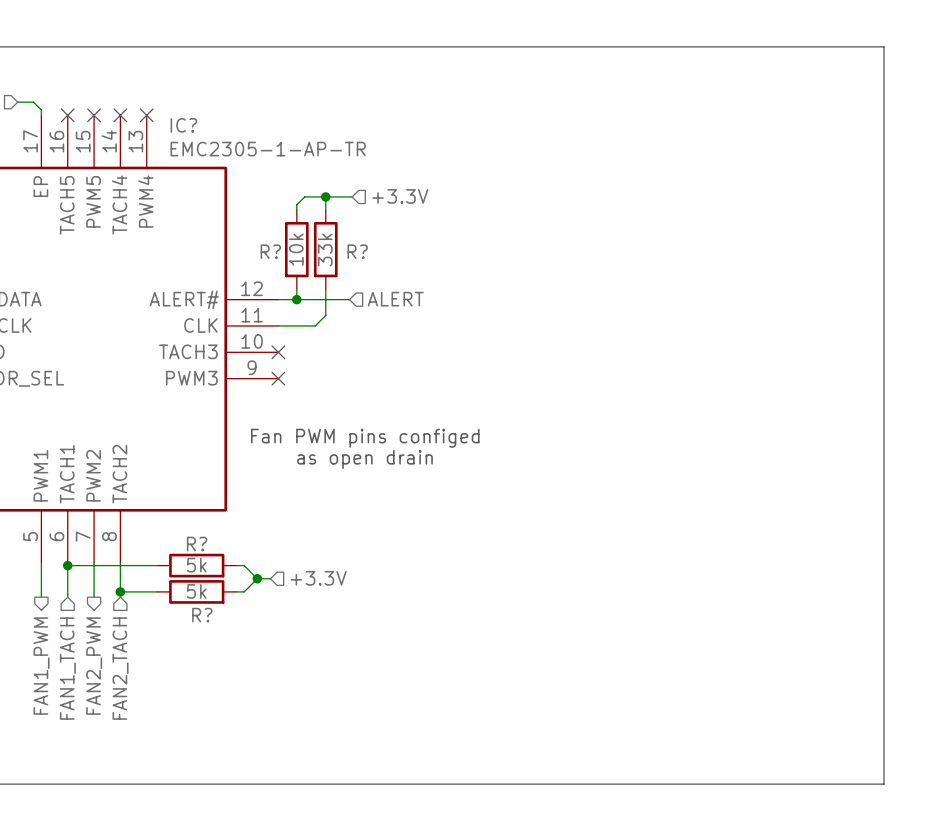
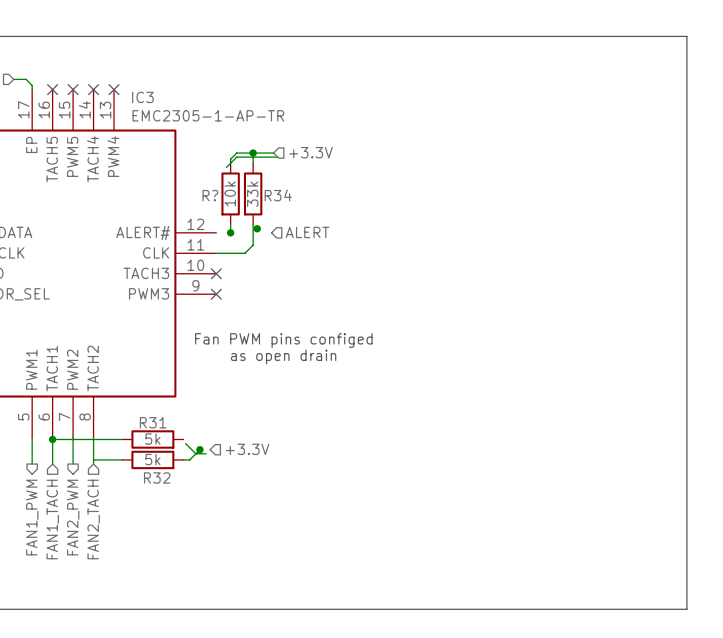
IC? name: IC? (183, 125) -> IC3 (142, 97)
wire: none -> (277, 157) (236, 157) (226, 167)
R? name: R? (357, 251) -> R34 (278, 195)
junction: none -> (257, 228)
wire: (278, 299) (349, 299) -> none
R? name: R? (197, 544) -> R31 (153, 422)
wire: (236, 565) (244, 565) (257, 578) (270, 578) -> none
wire: none -> (185, 443) (195, 453) (206, 453)
junction: (120, 591) -> none
R? name: R? (202, 615) -> R32 (157, 477)

